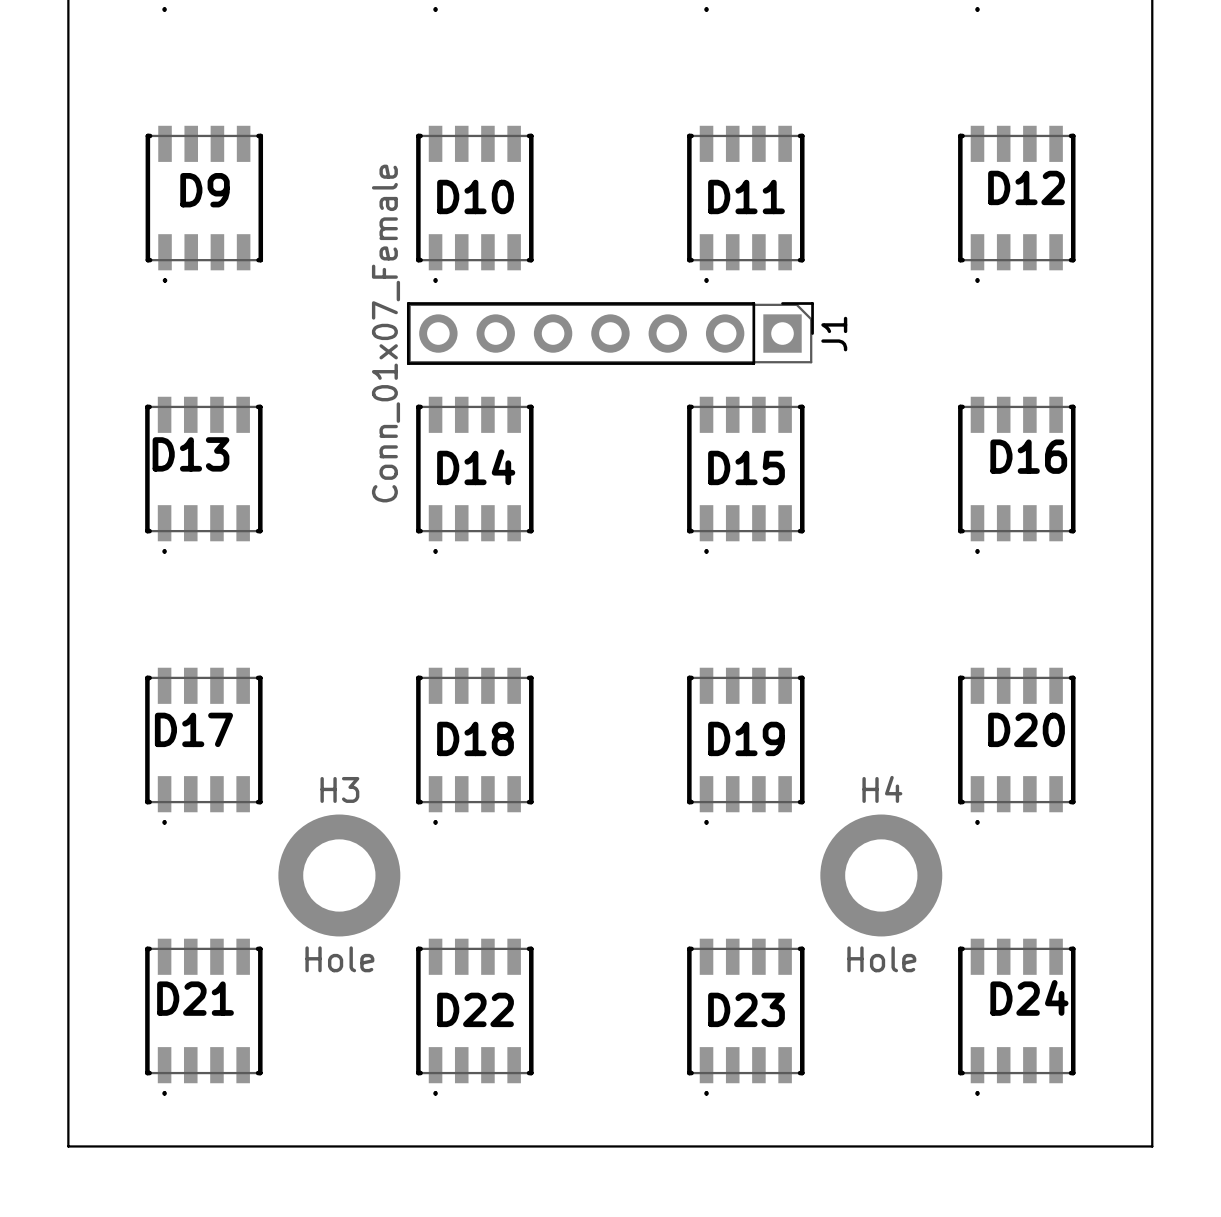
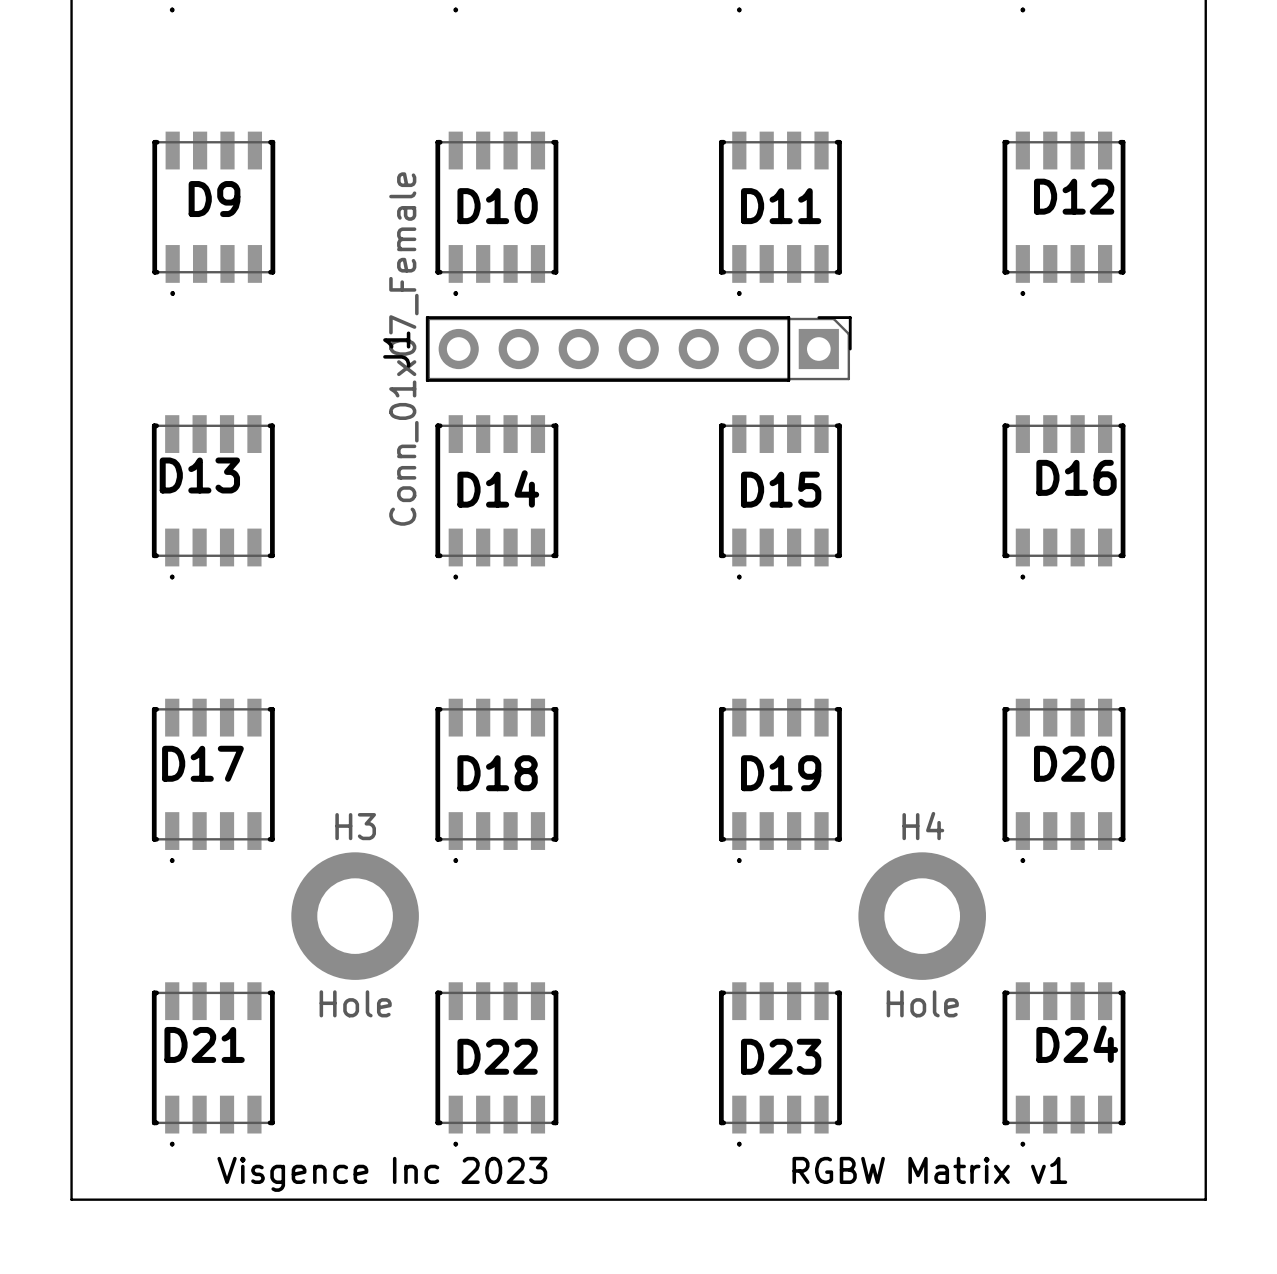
J1 name position: J1 (834, 334) -> J1 (396, 349)
text: none -> RGBW Matrix v1 (929, 1170)
text: none -> Visgence Inc 2023 (382, 1174)

